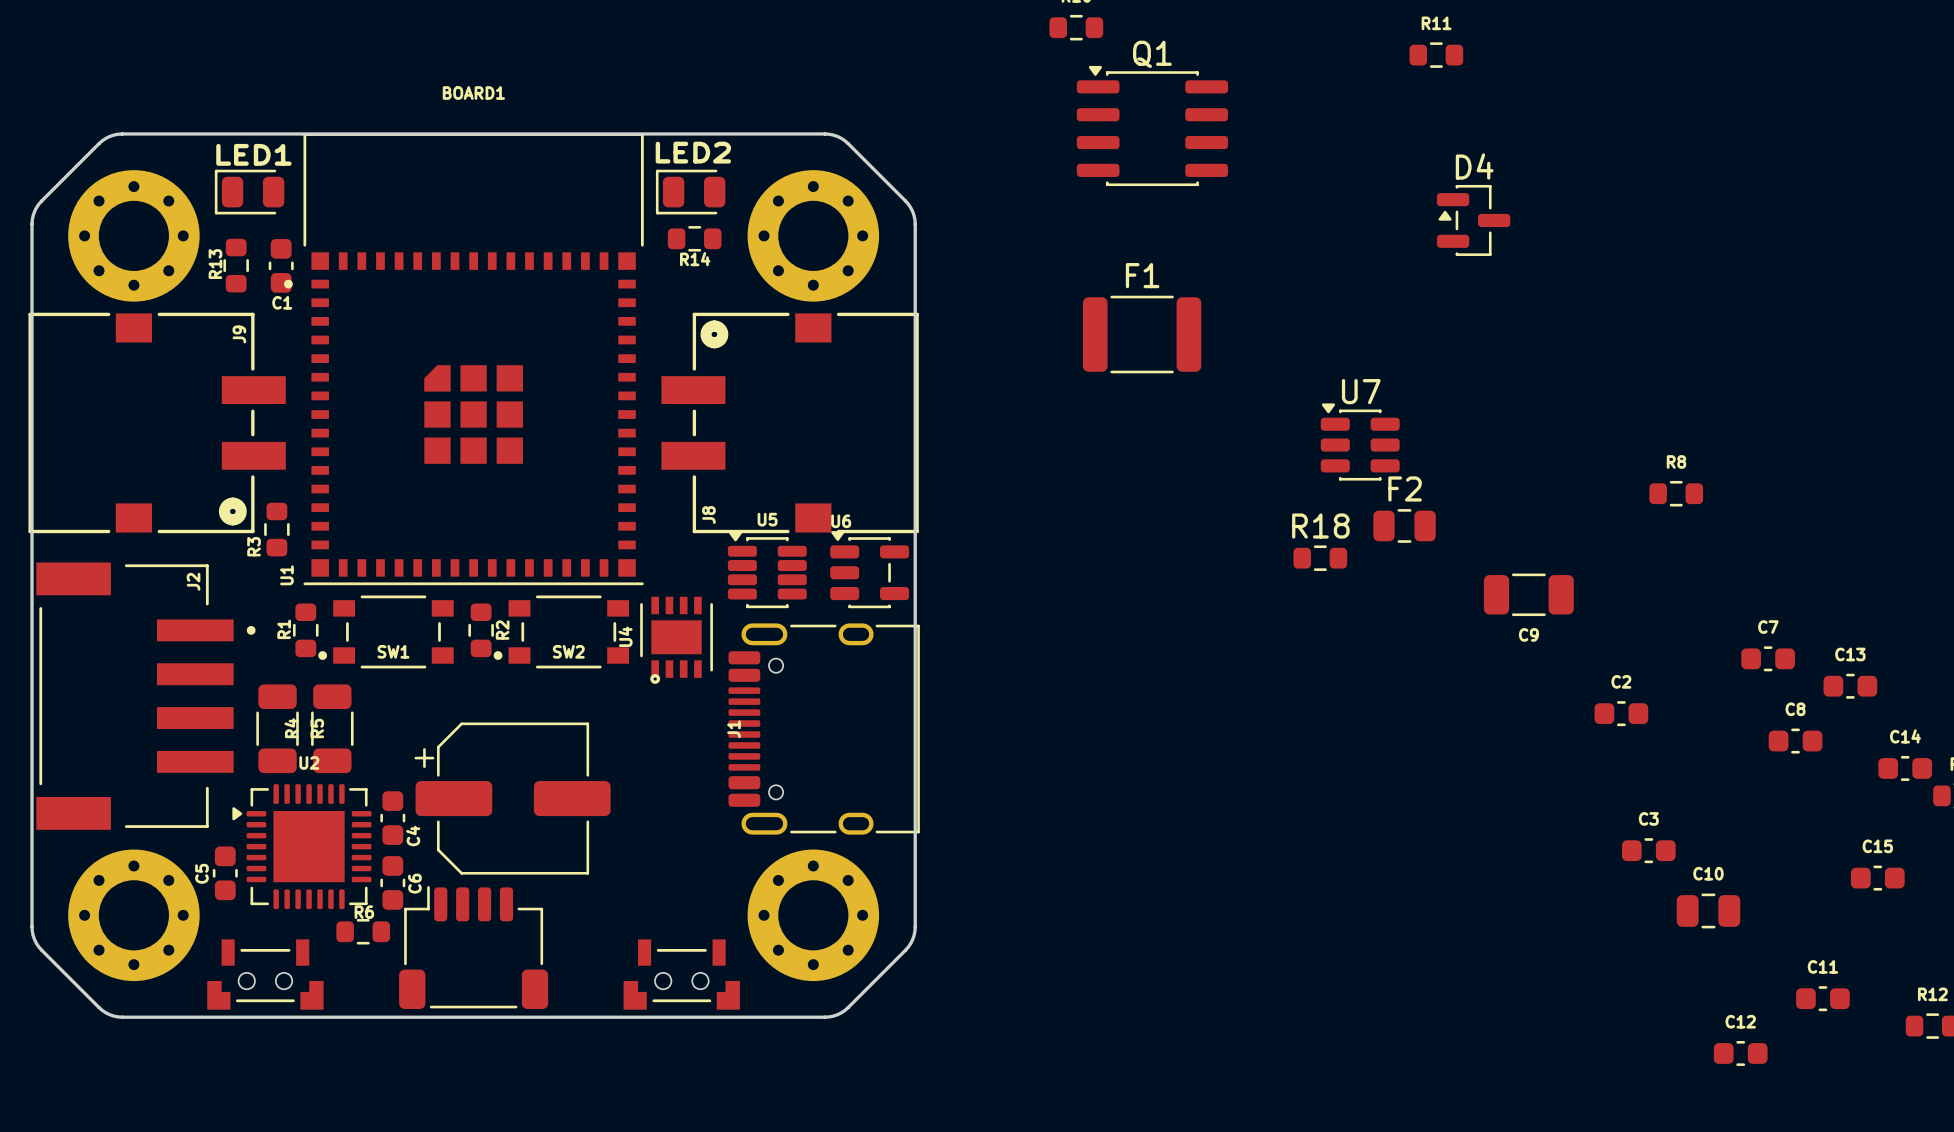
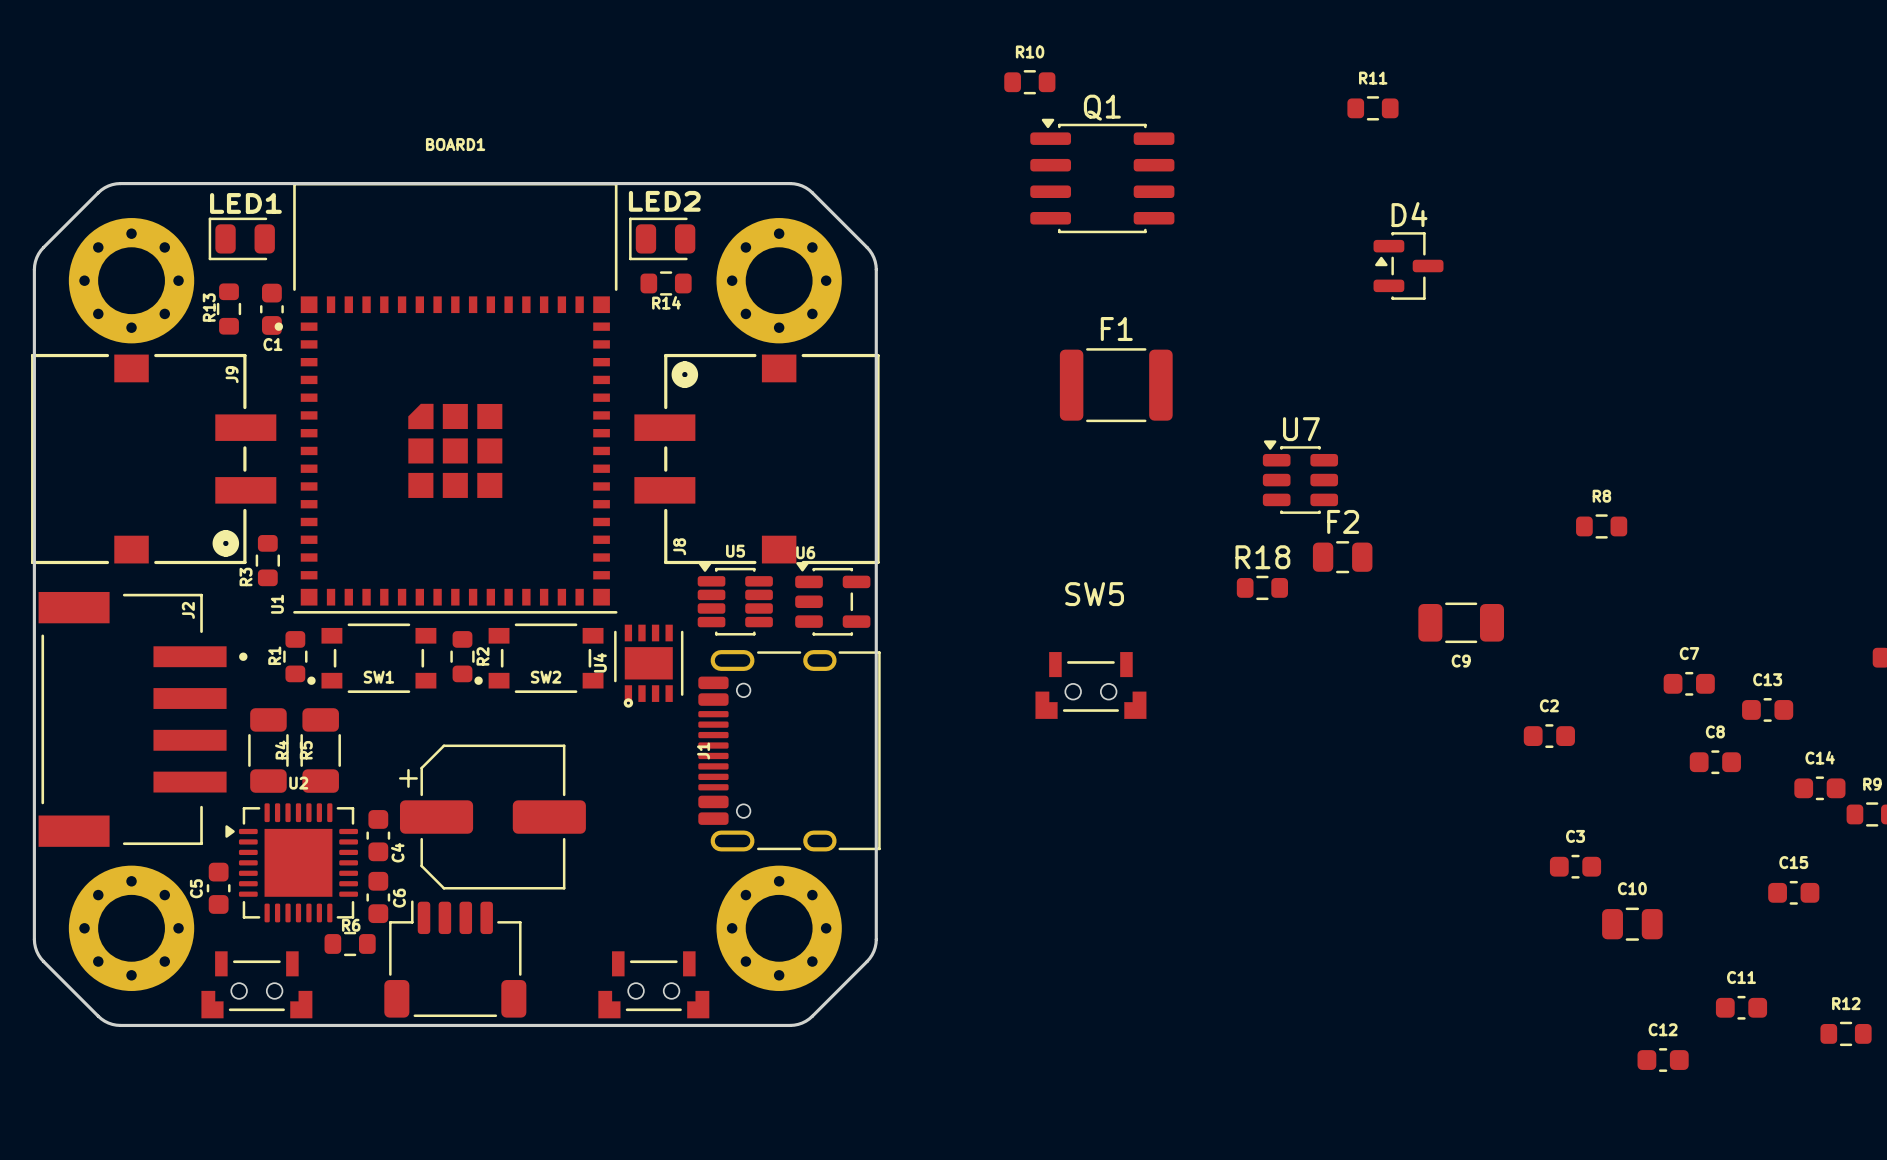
F1 position: (1142, 334) -> (1116, 385)
SW5: none -> (1090, 685)

